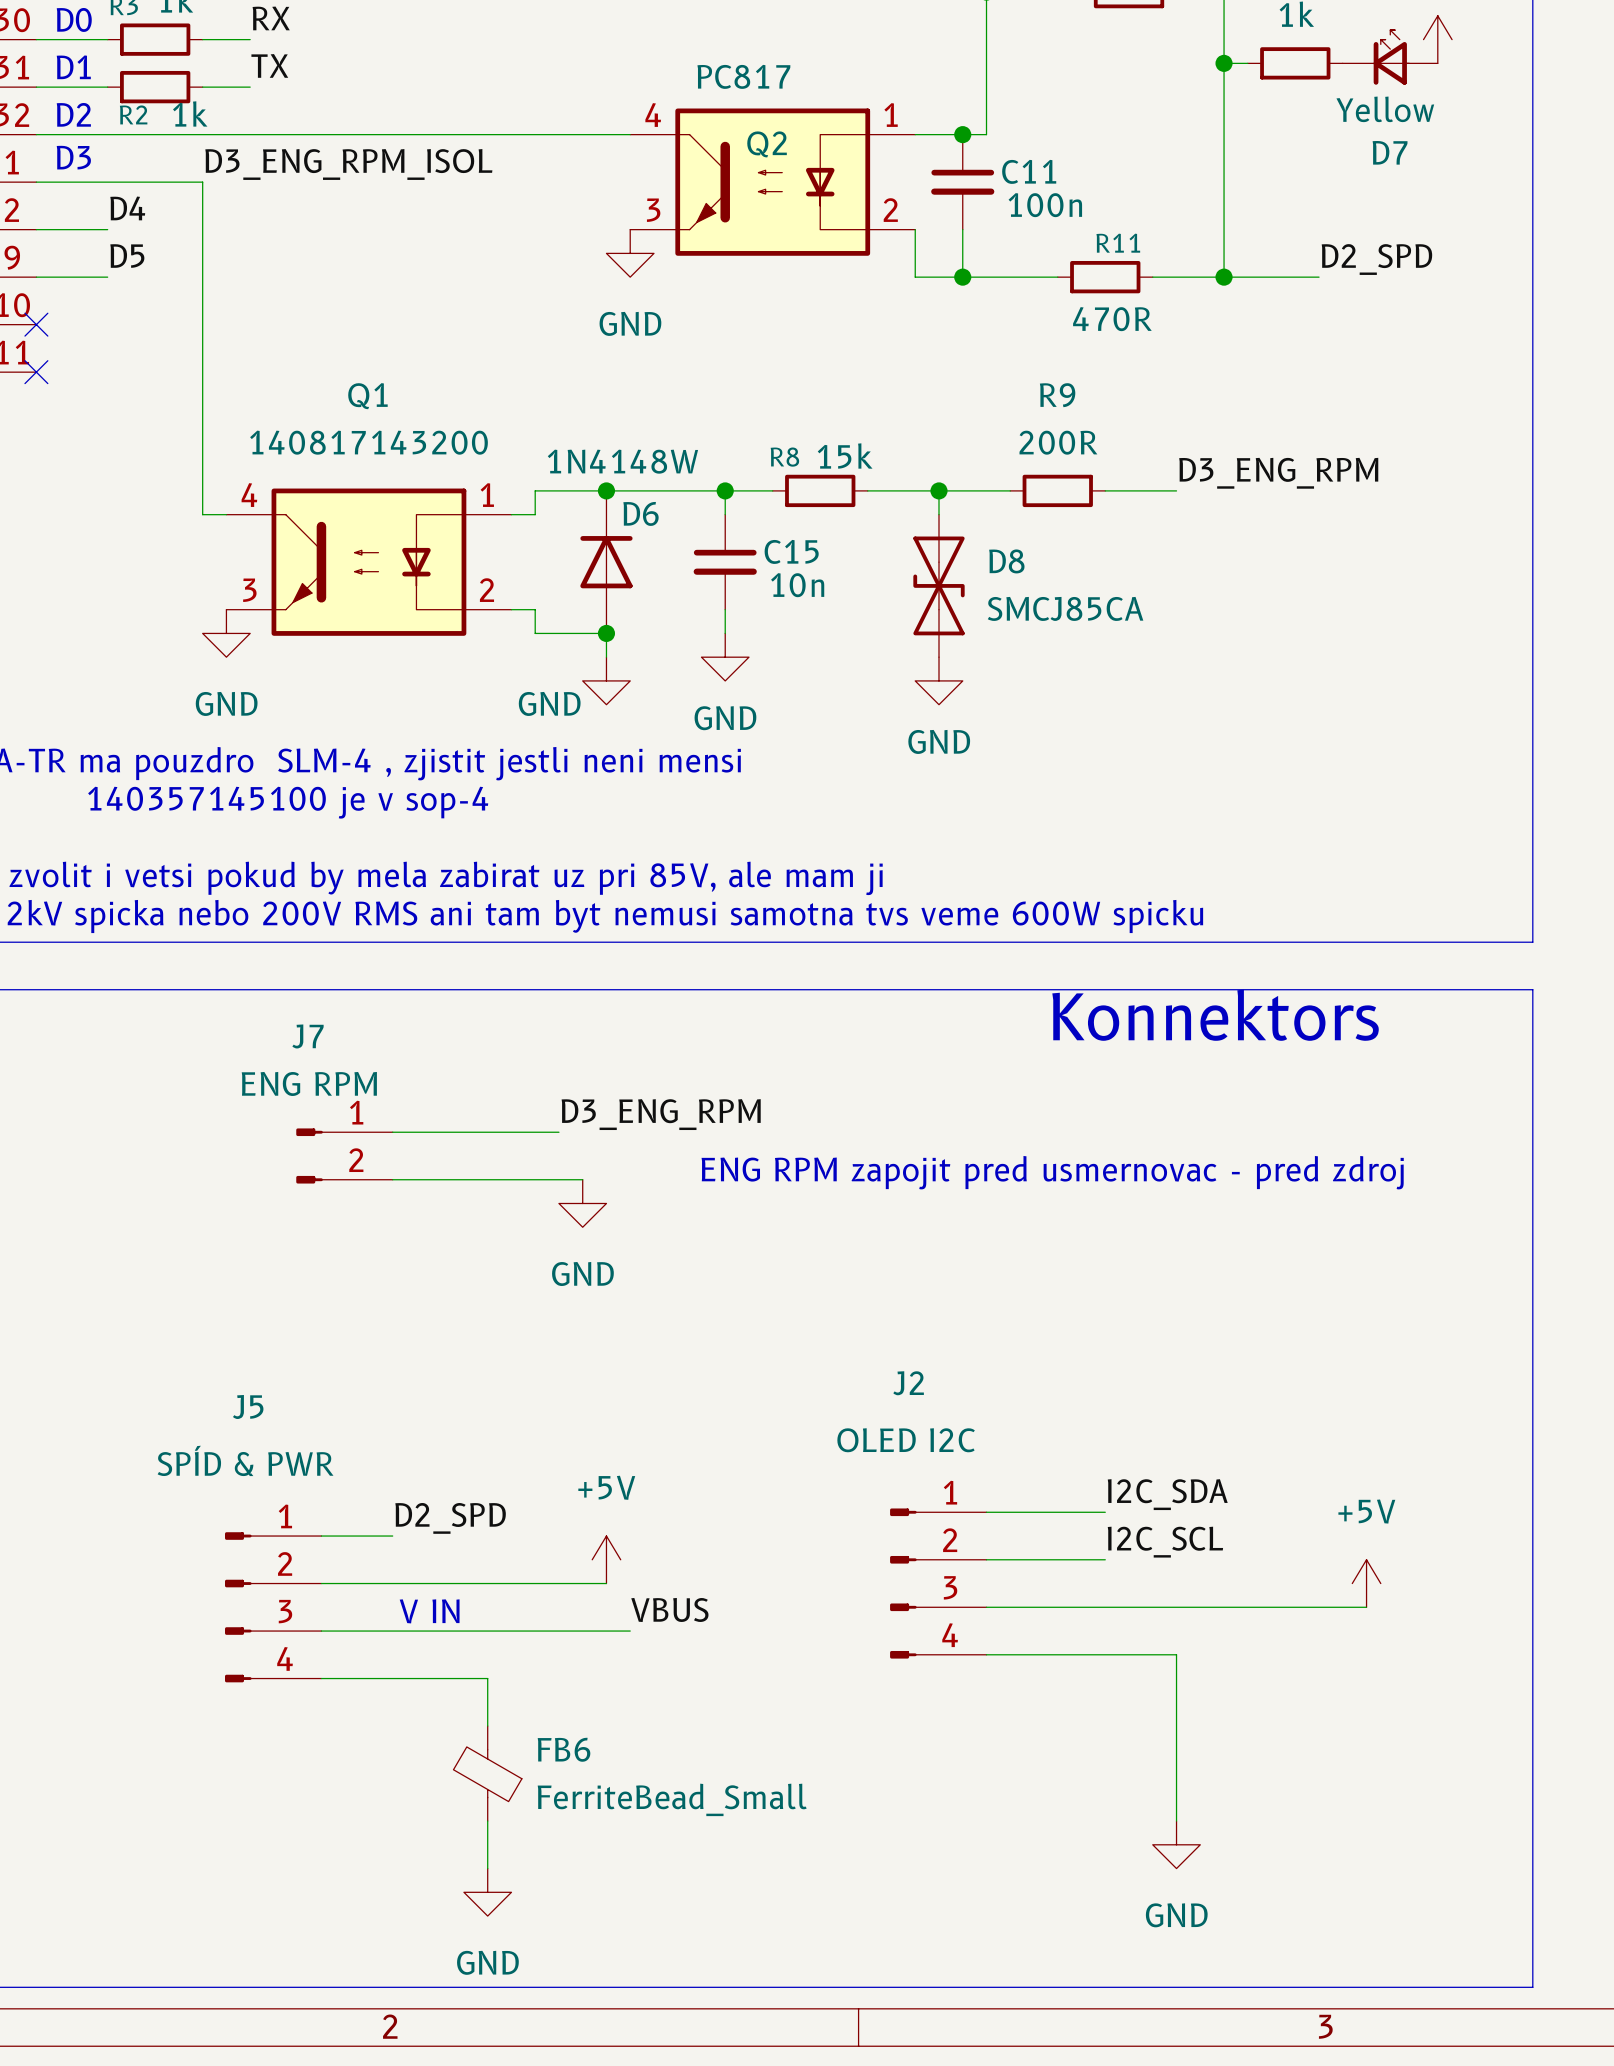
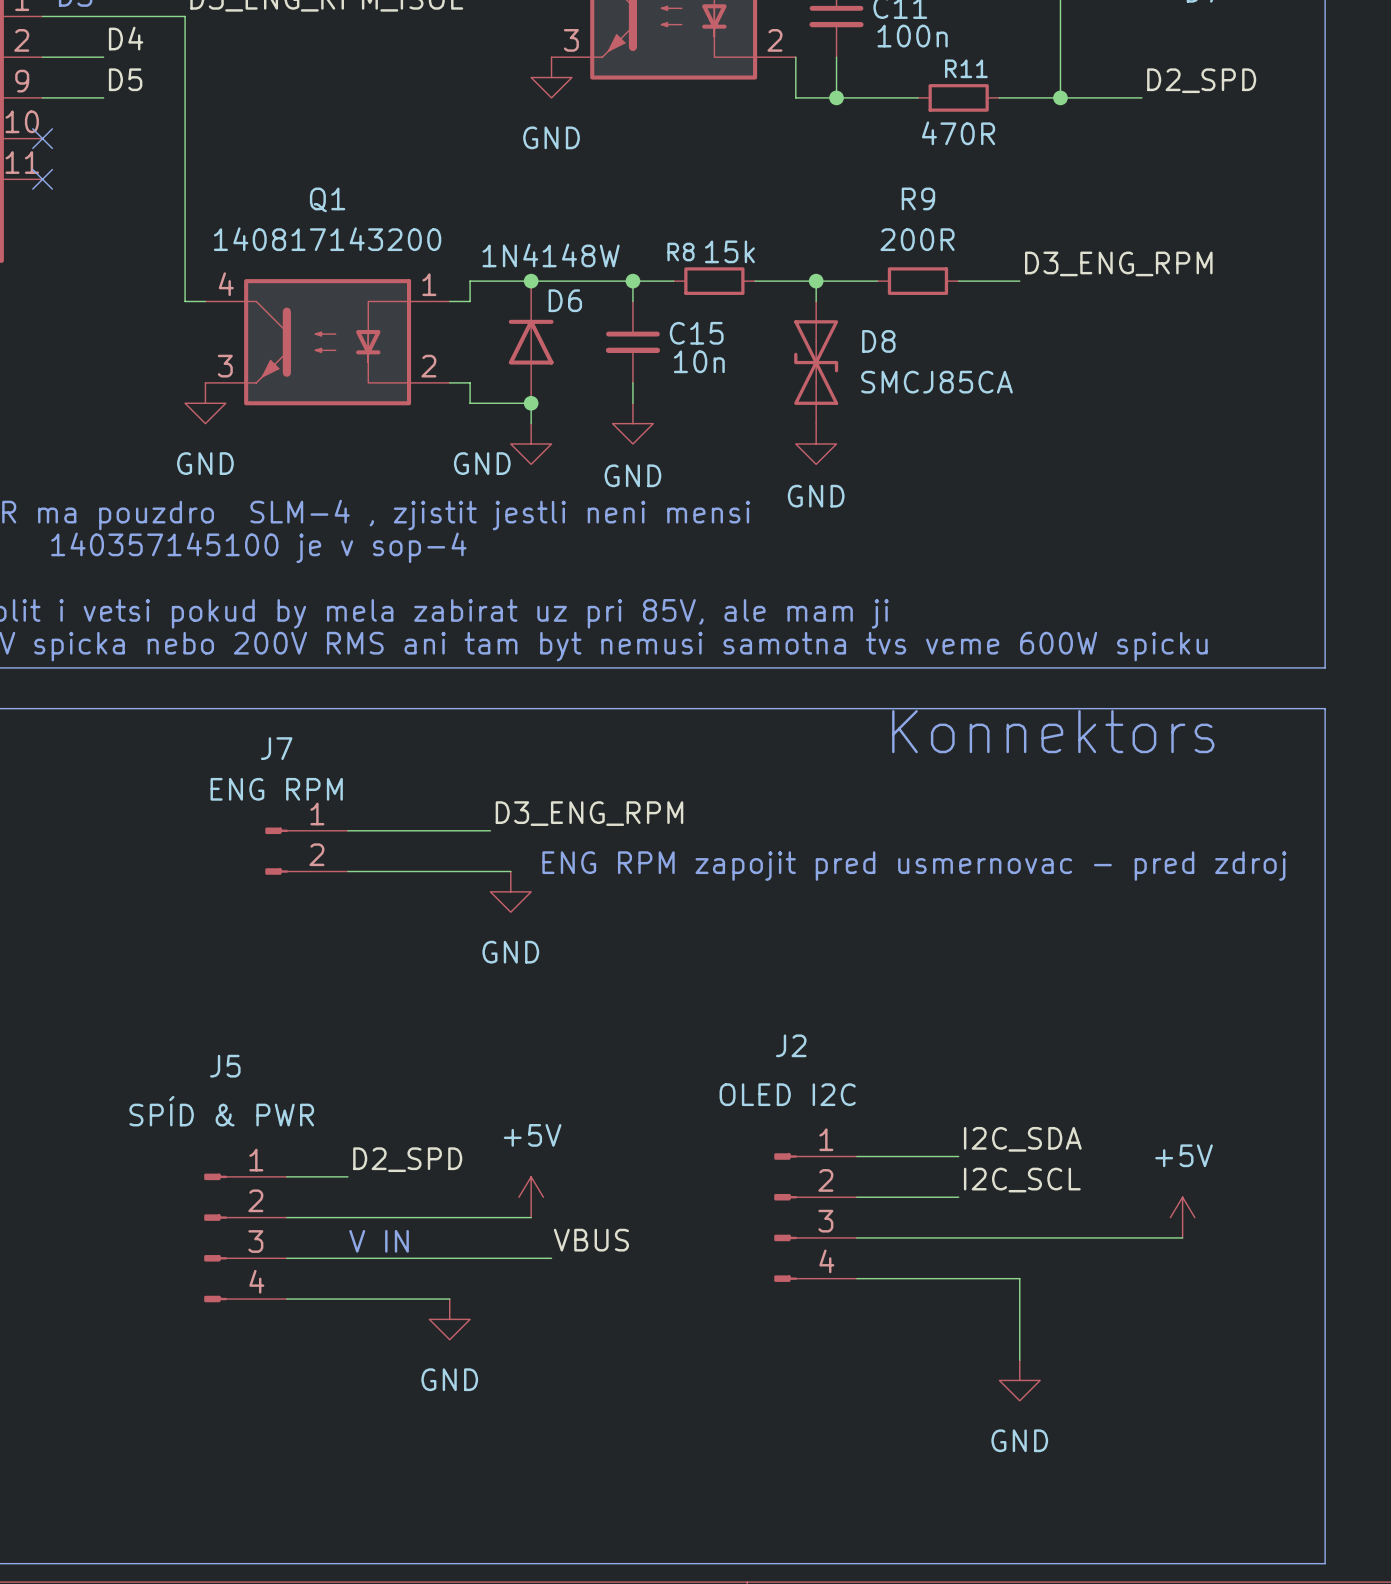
wire: (487, 1678) (487, 1726) -> (429, 1299) (449, 1299)
wire: (1176, 1749) (1176, 1821) -> none
FB6: FerriteBead_Small (487, 1773) -> none
wire: (487, 1821) (487, 1868) -> none
power symbol position: GND (1176, 1844) -> GND (1019, 1380)
power symbol position: GND (487, 1892) -> GND (449, 1319)

